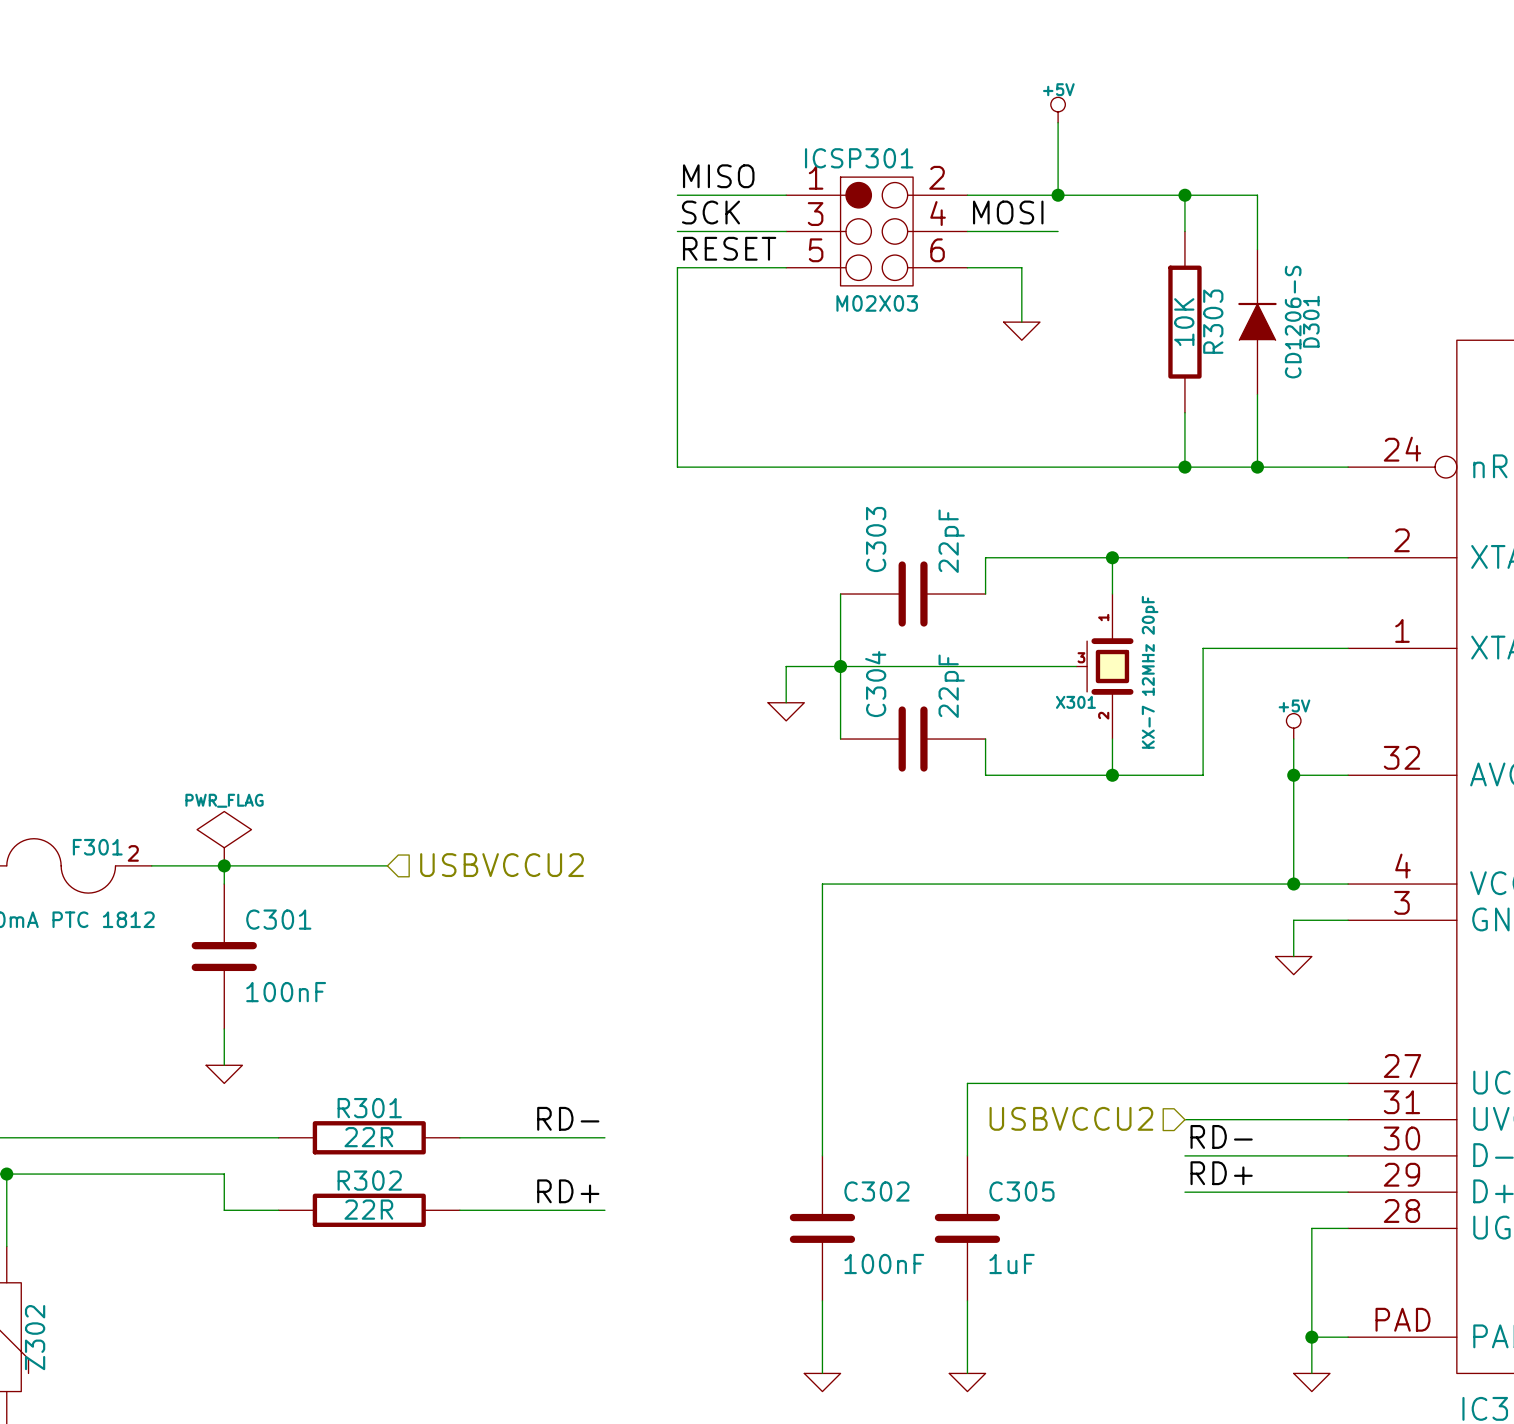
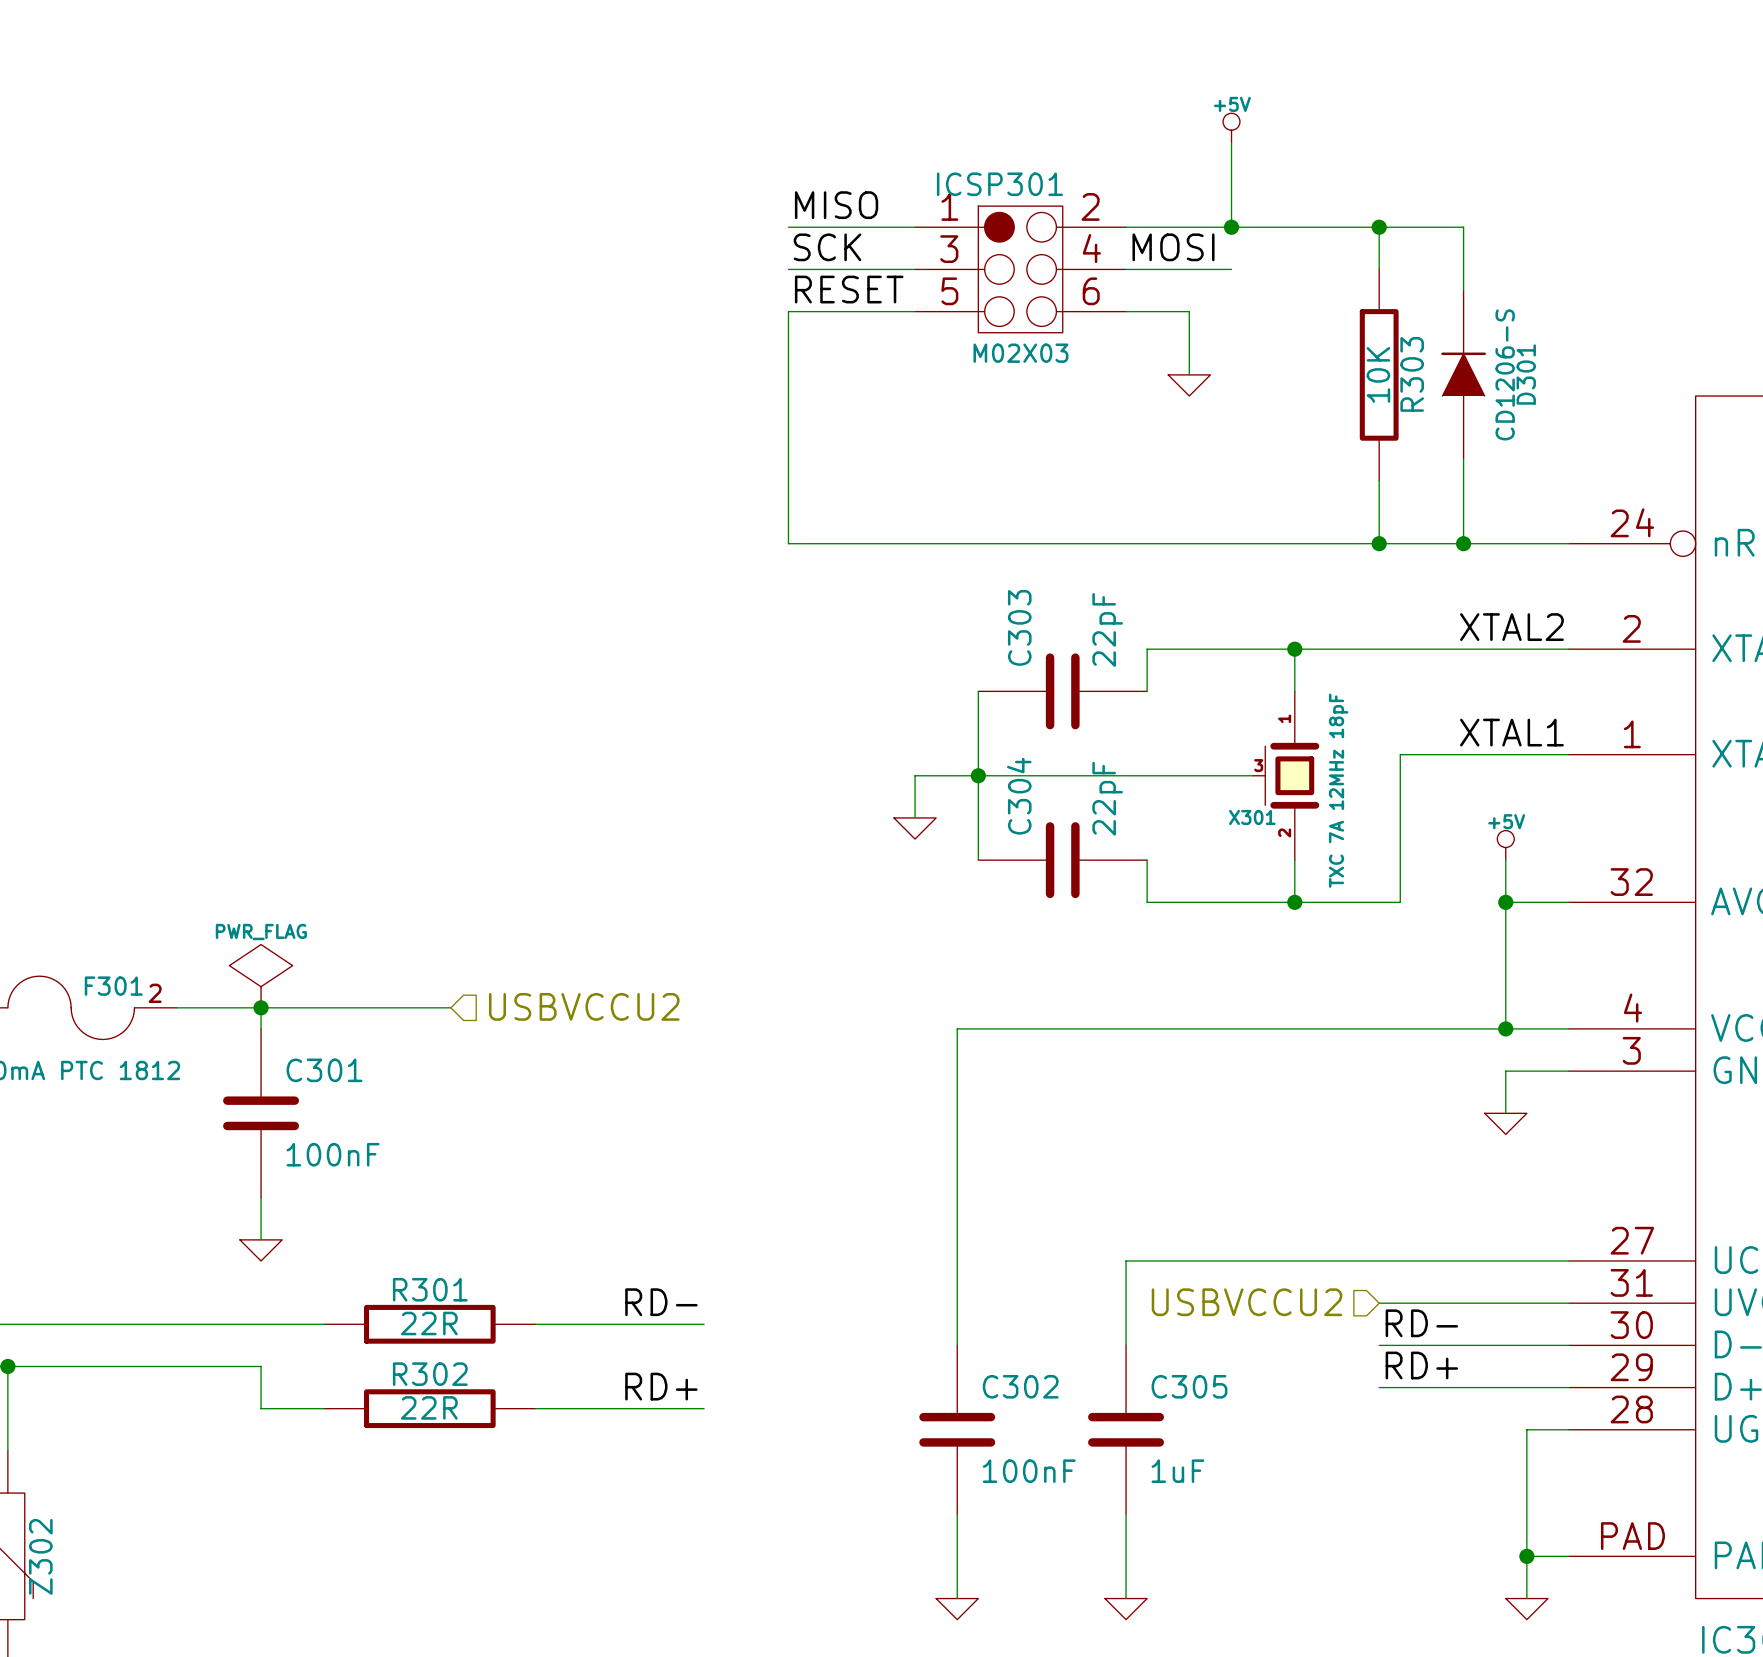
label: none -> XTAL2 (1511, 627)
label: none -> XTAL1 (1511, 732)
X301 value: KX-7 12MHz 20pF (1150, 672) -> TXC 7A 12MHz 18pF (1338, 790)

